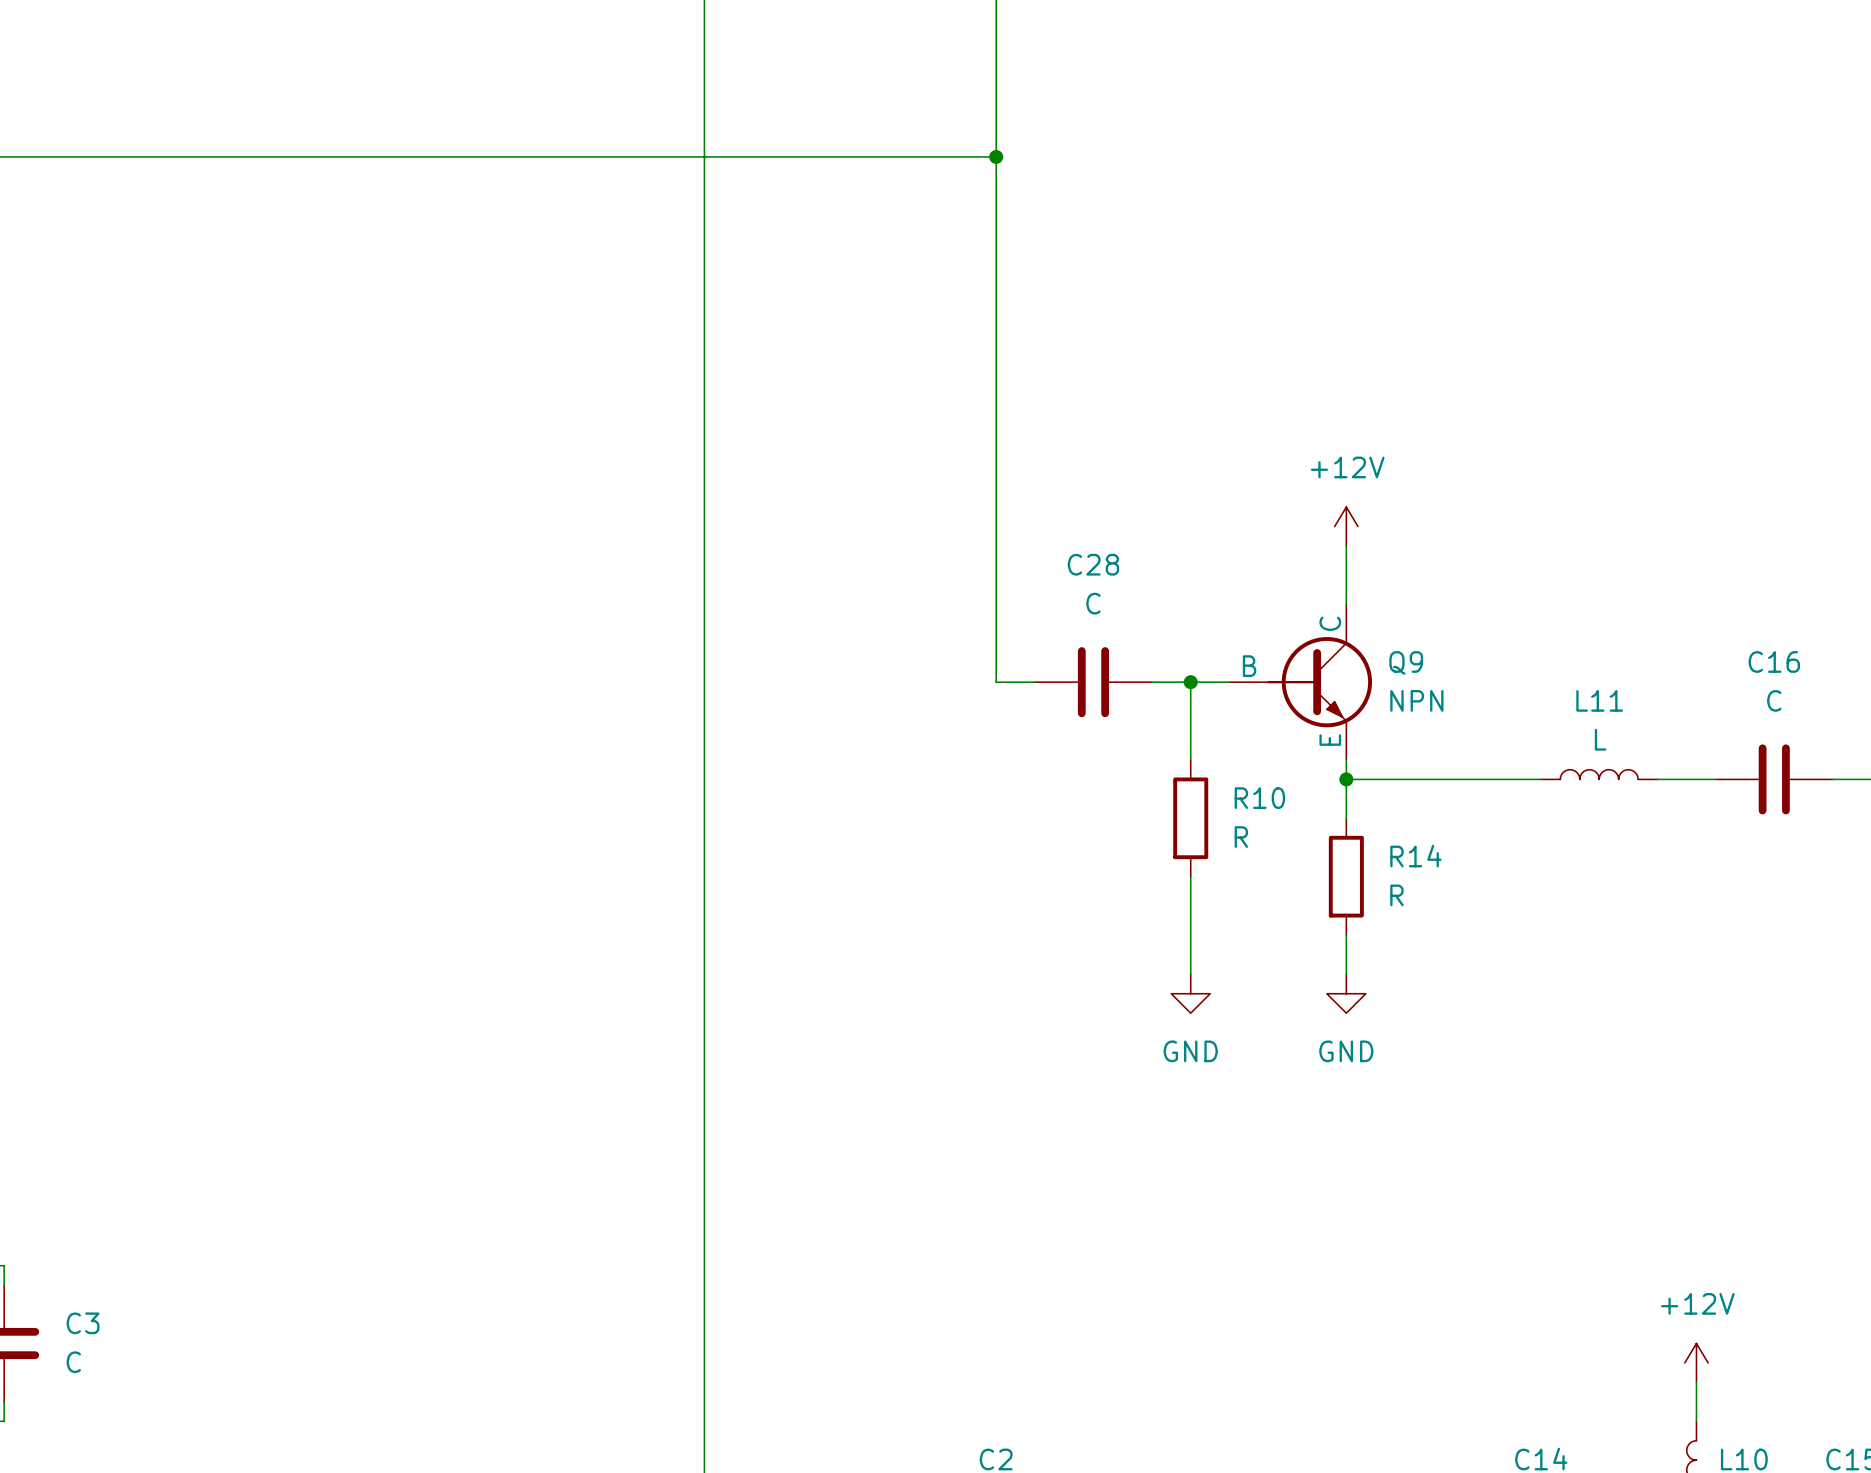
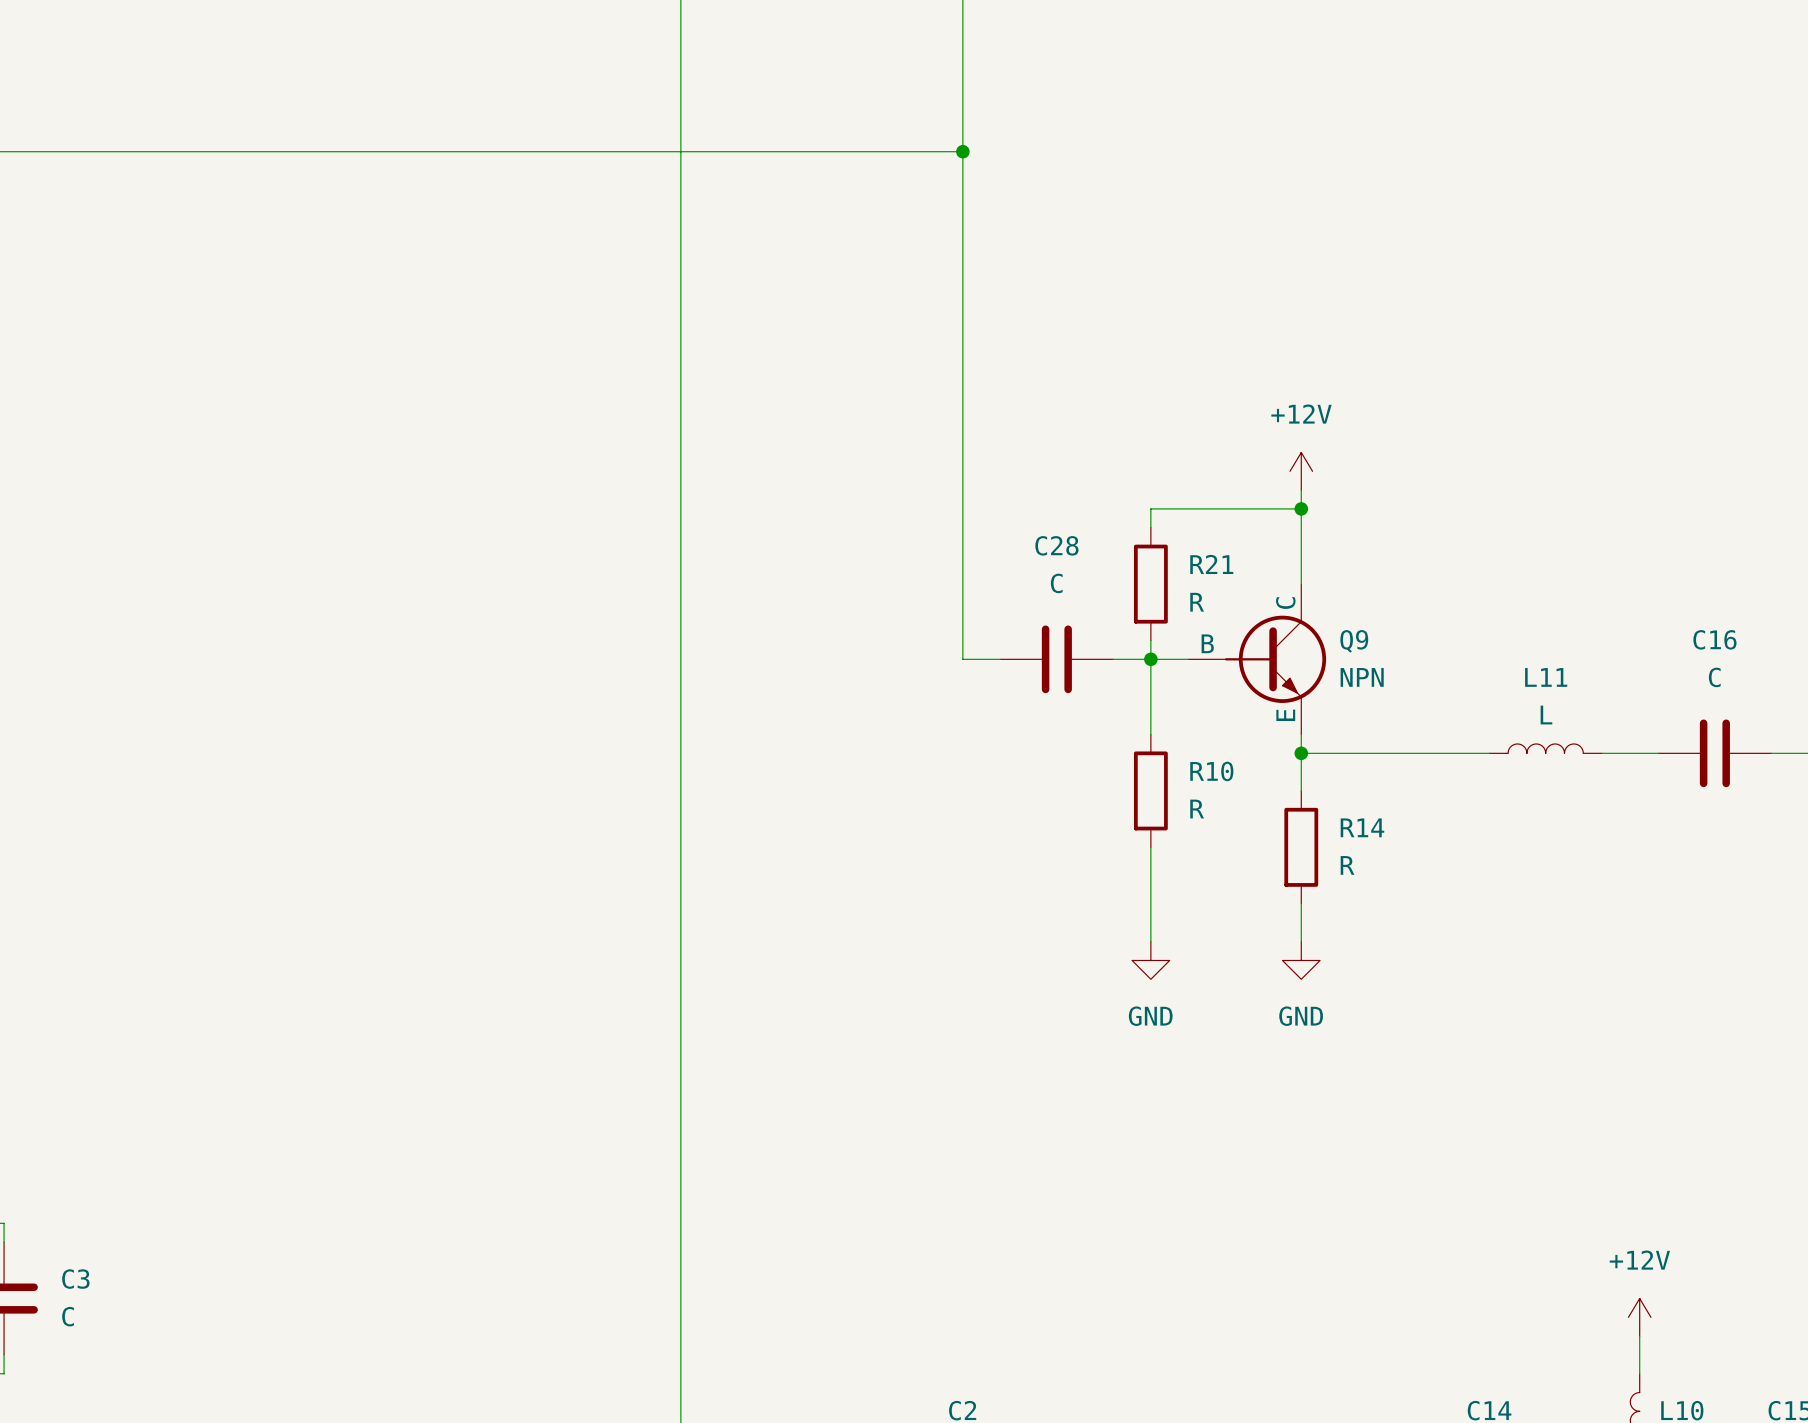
wire: none -> (1301, 508) (1150, 508) (1150, 527)
power symbol position: +12V (1346, 526) -> +12V (1301, 471)
junction: none -> (1301, 508)
R21: none -> R (1150, 584)
wire: none -> (1150, 640) (1150, 659)

